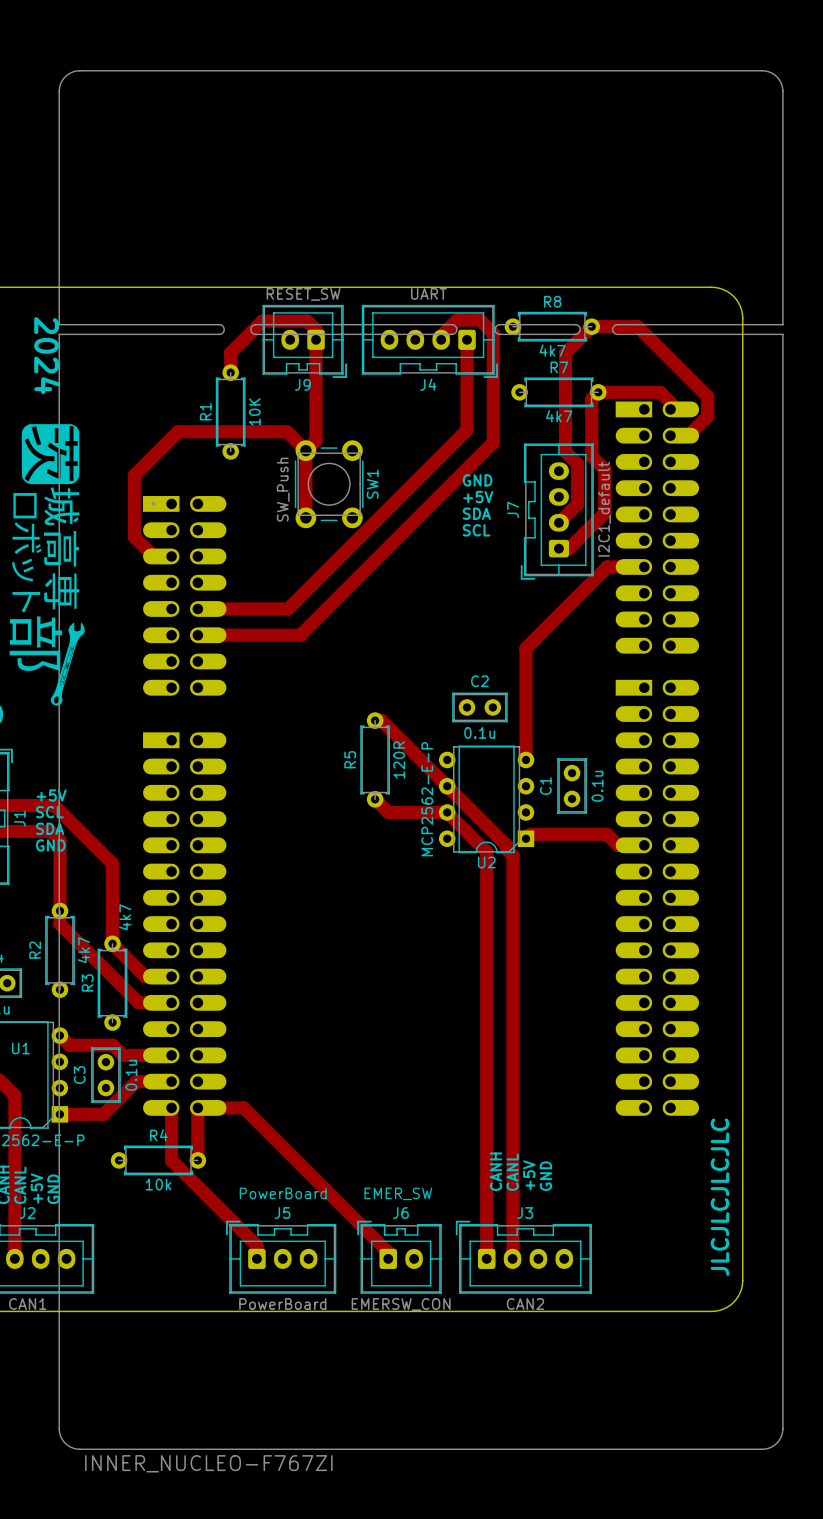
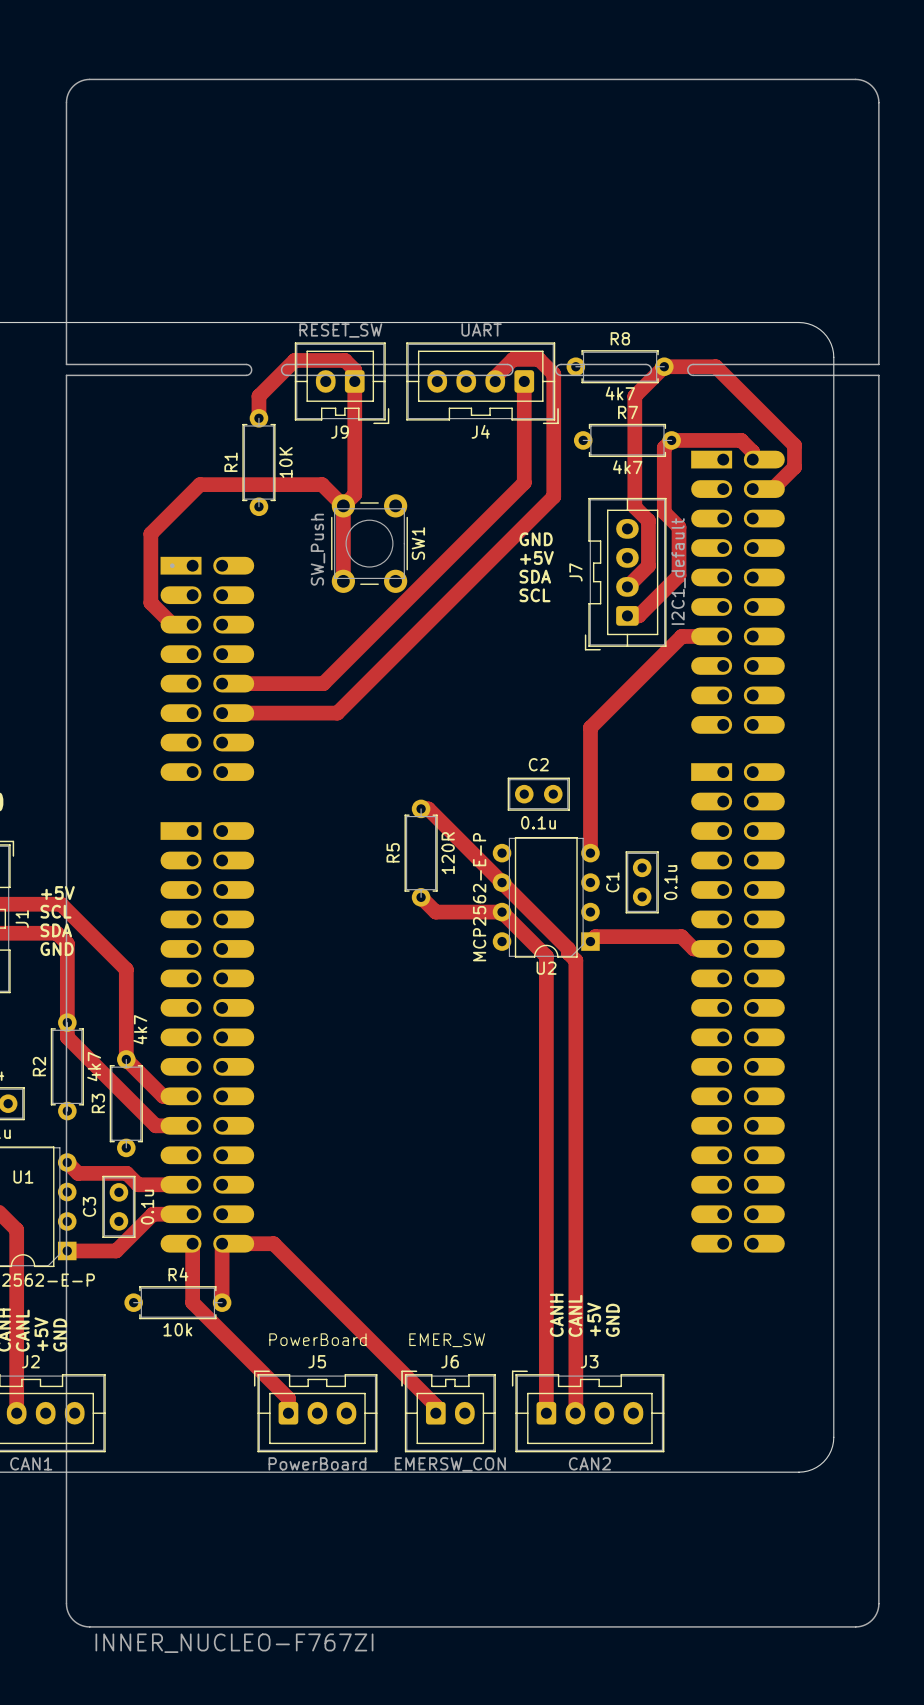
text: 2024 (47, 355) -> none
drawing: [9, 424, 85, 706] -> none
text: JLCJLCJLCJLC (719, 1197) -> none

